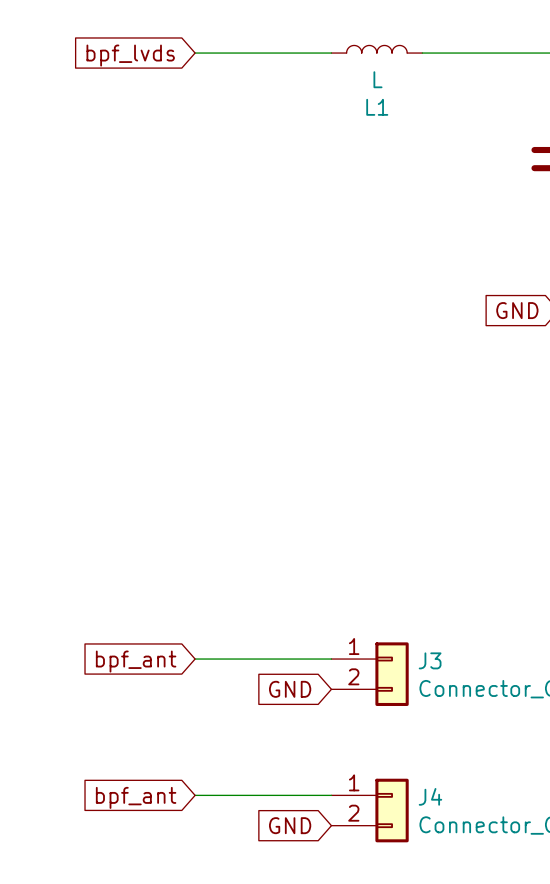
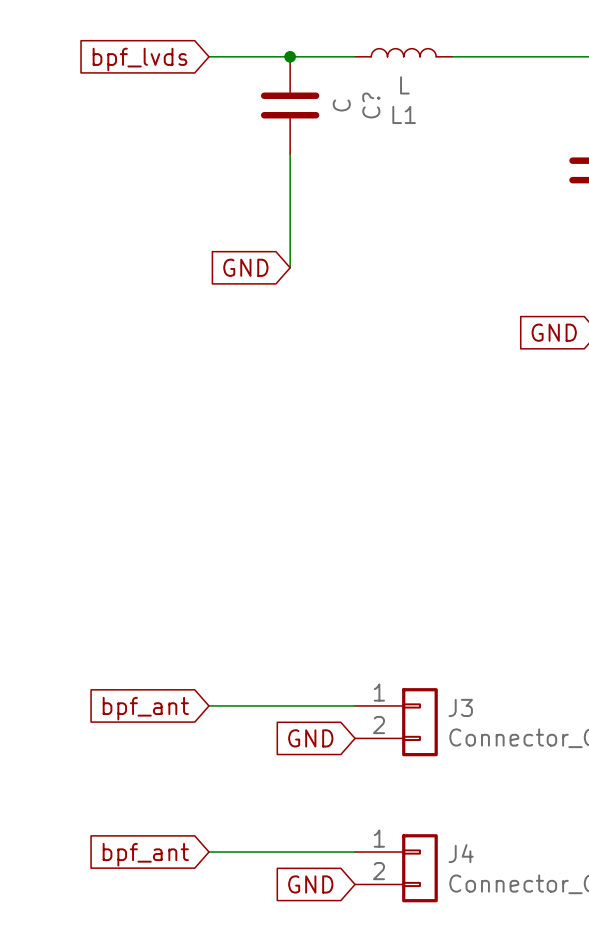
junction: none -> (290, 56)
C?: none -> C (290, 105)
wire: none -> (290, 154) (290, 267)
global label: none -> GND (245, 267)

